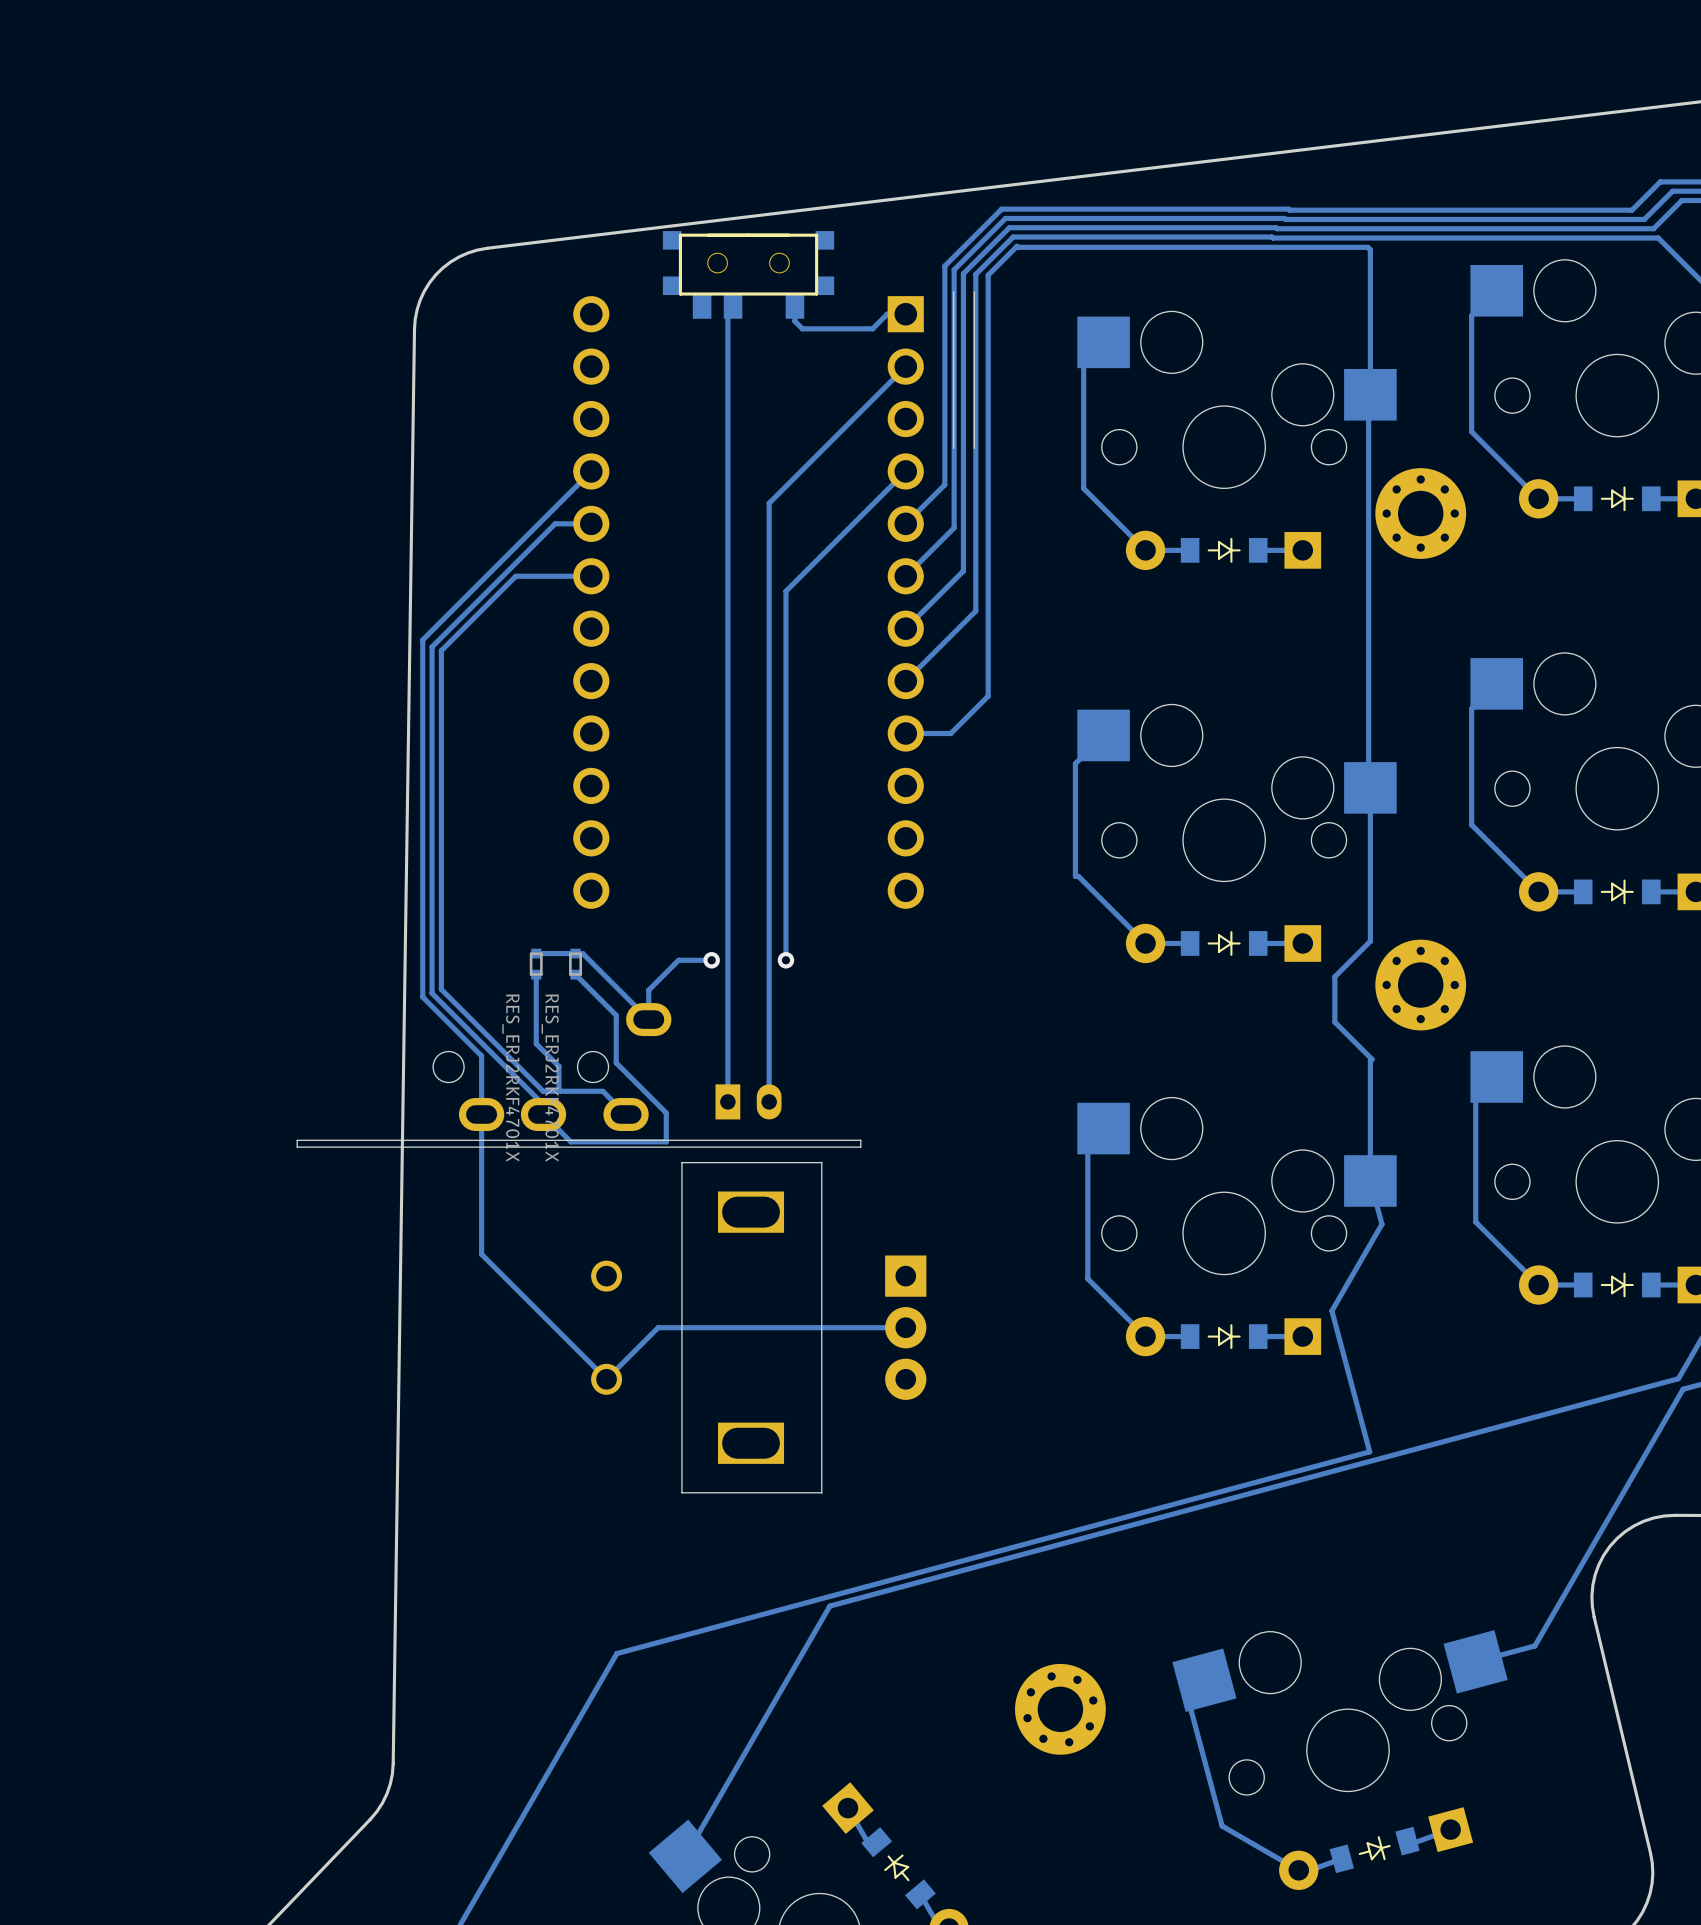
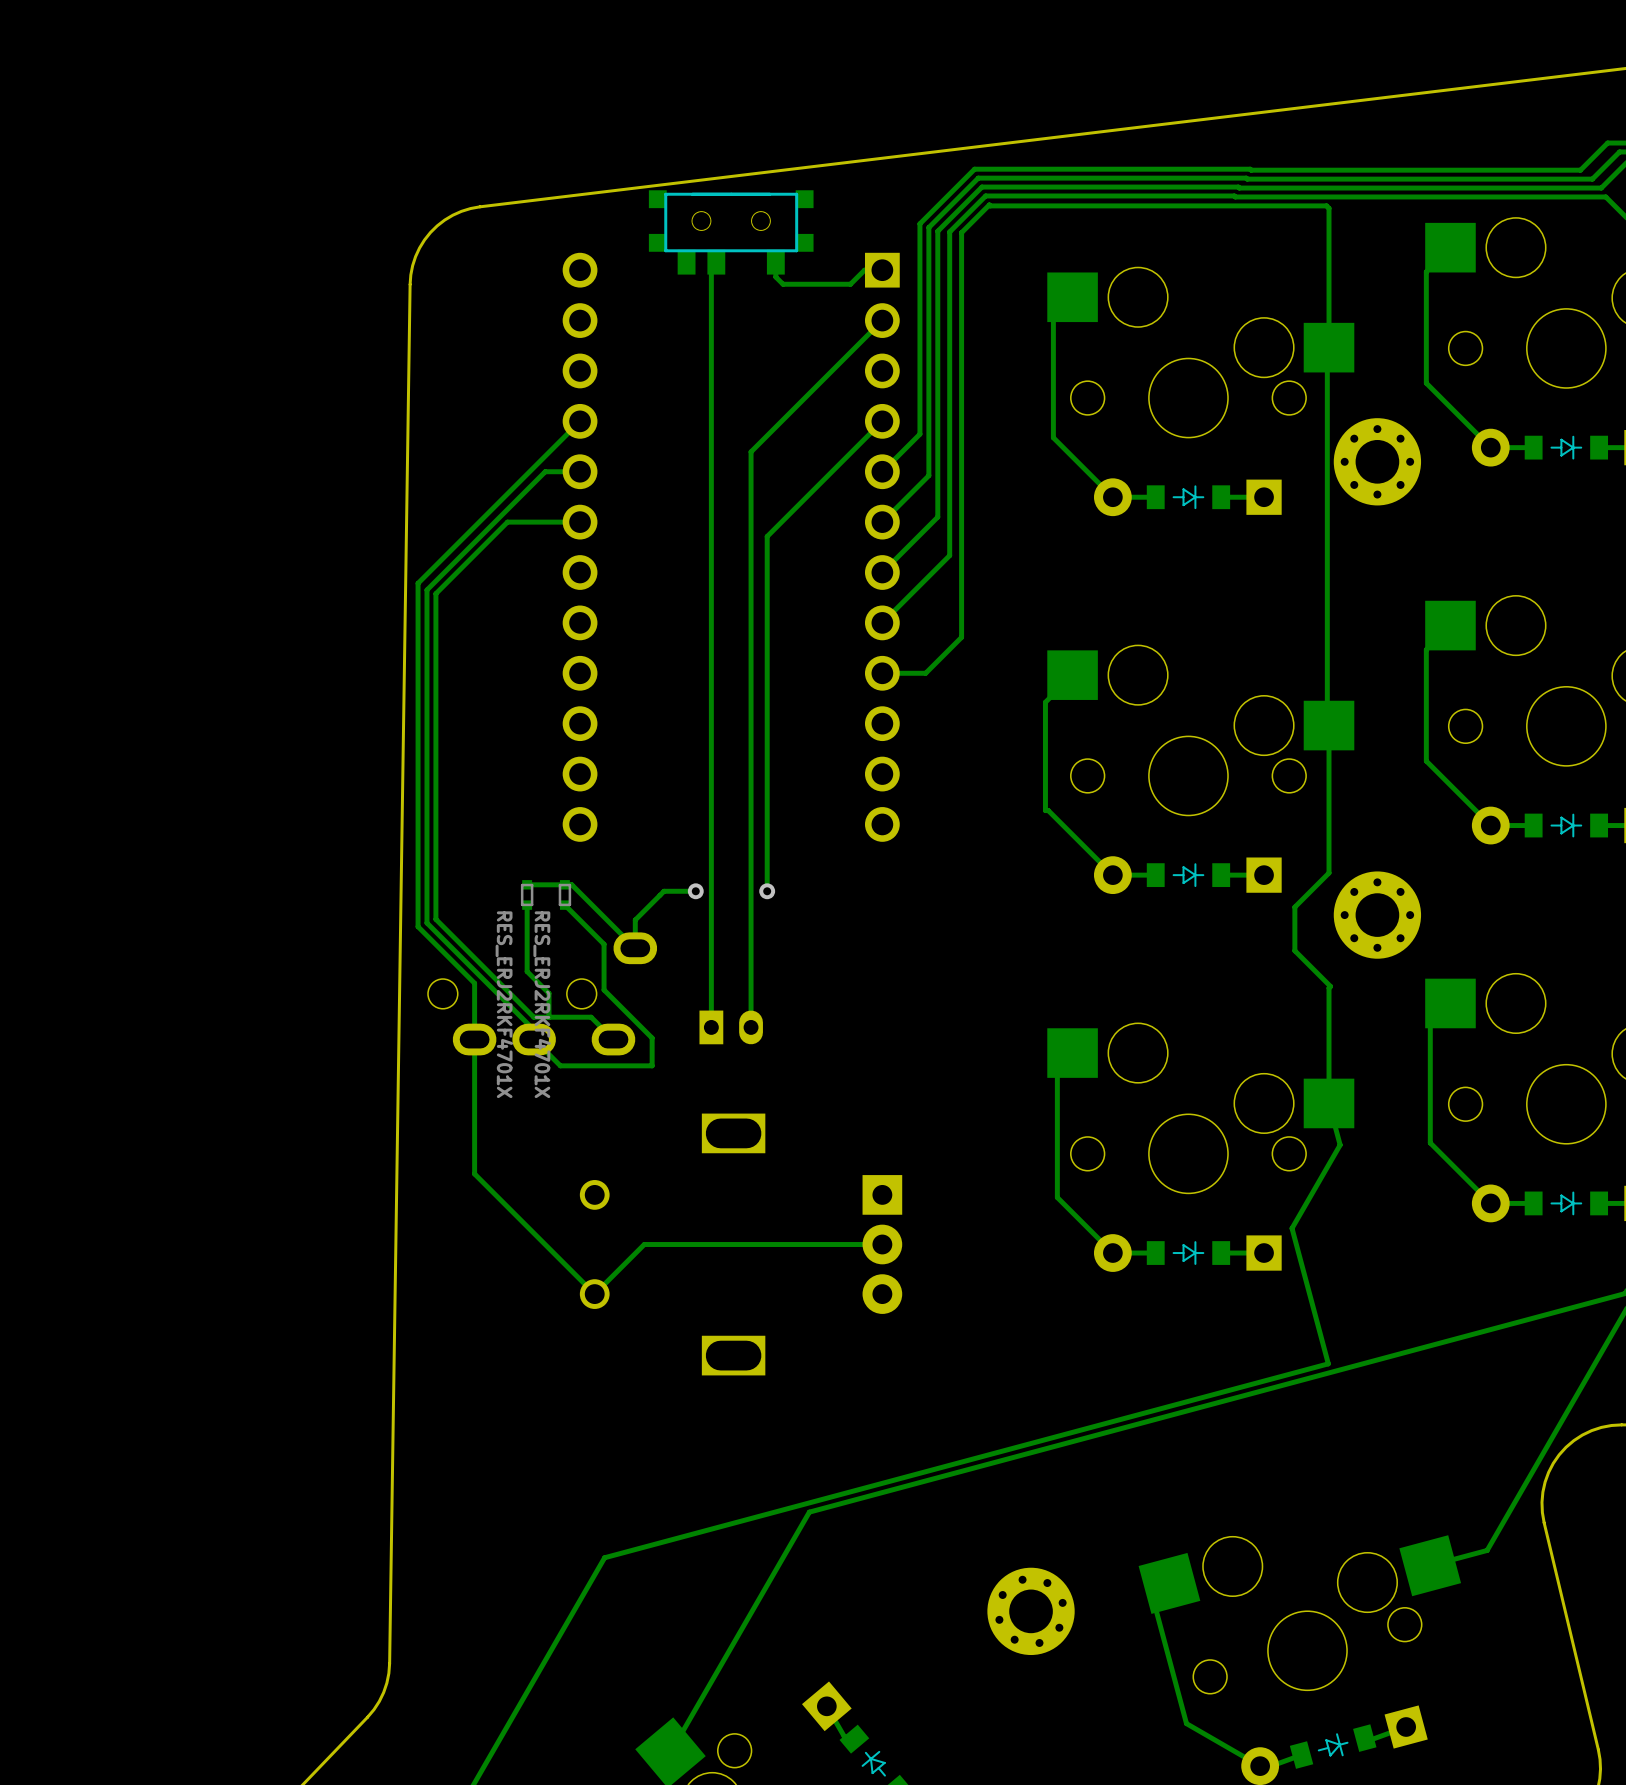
board edge: (953, 291) (953, 448) -> none
board edge: (974, 291) (974, 448) -> none
board edge: (860, 1140) (297, 1140) (297, 1147) (860, 1147) (860, 1140) -> none
board edge: (821, 1162) (681, 1162) (681, 1492) (821, 1492) (821, 1162) -> none

